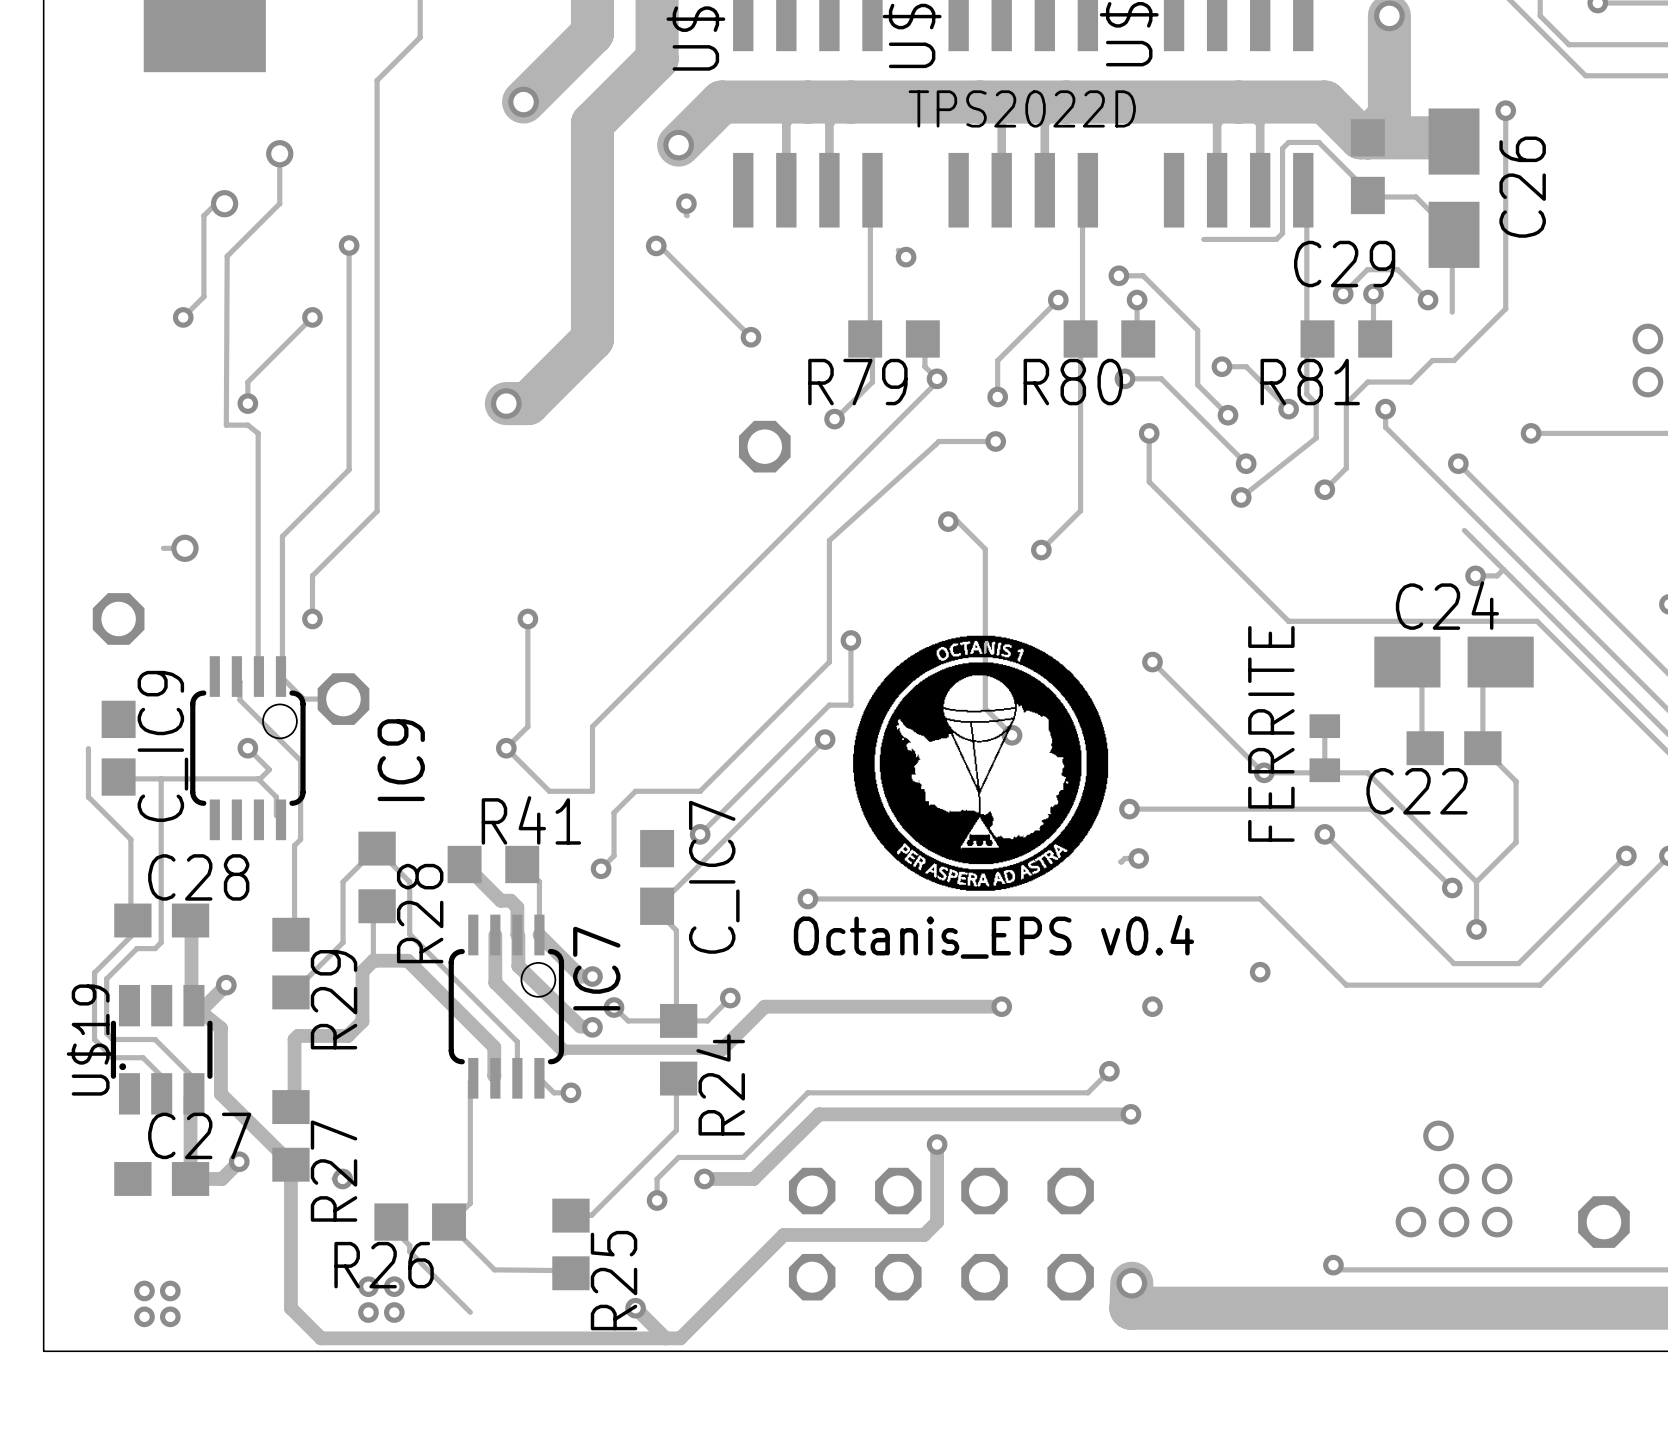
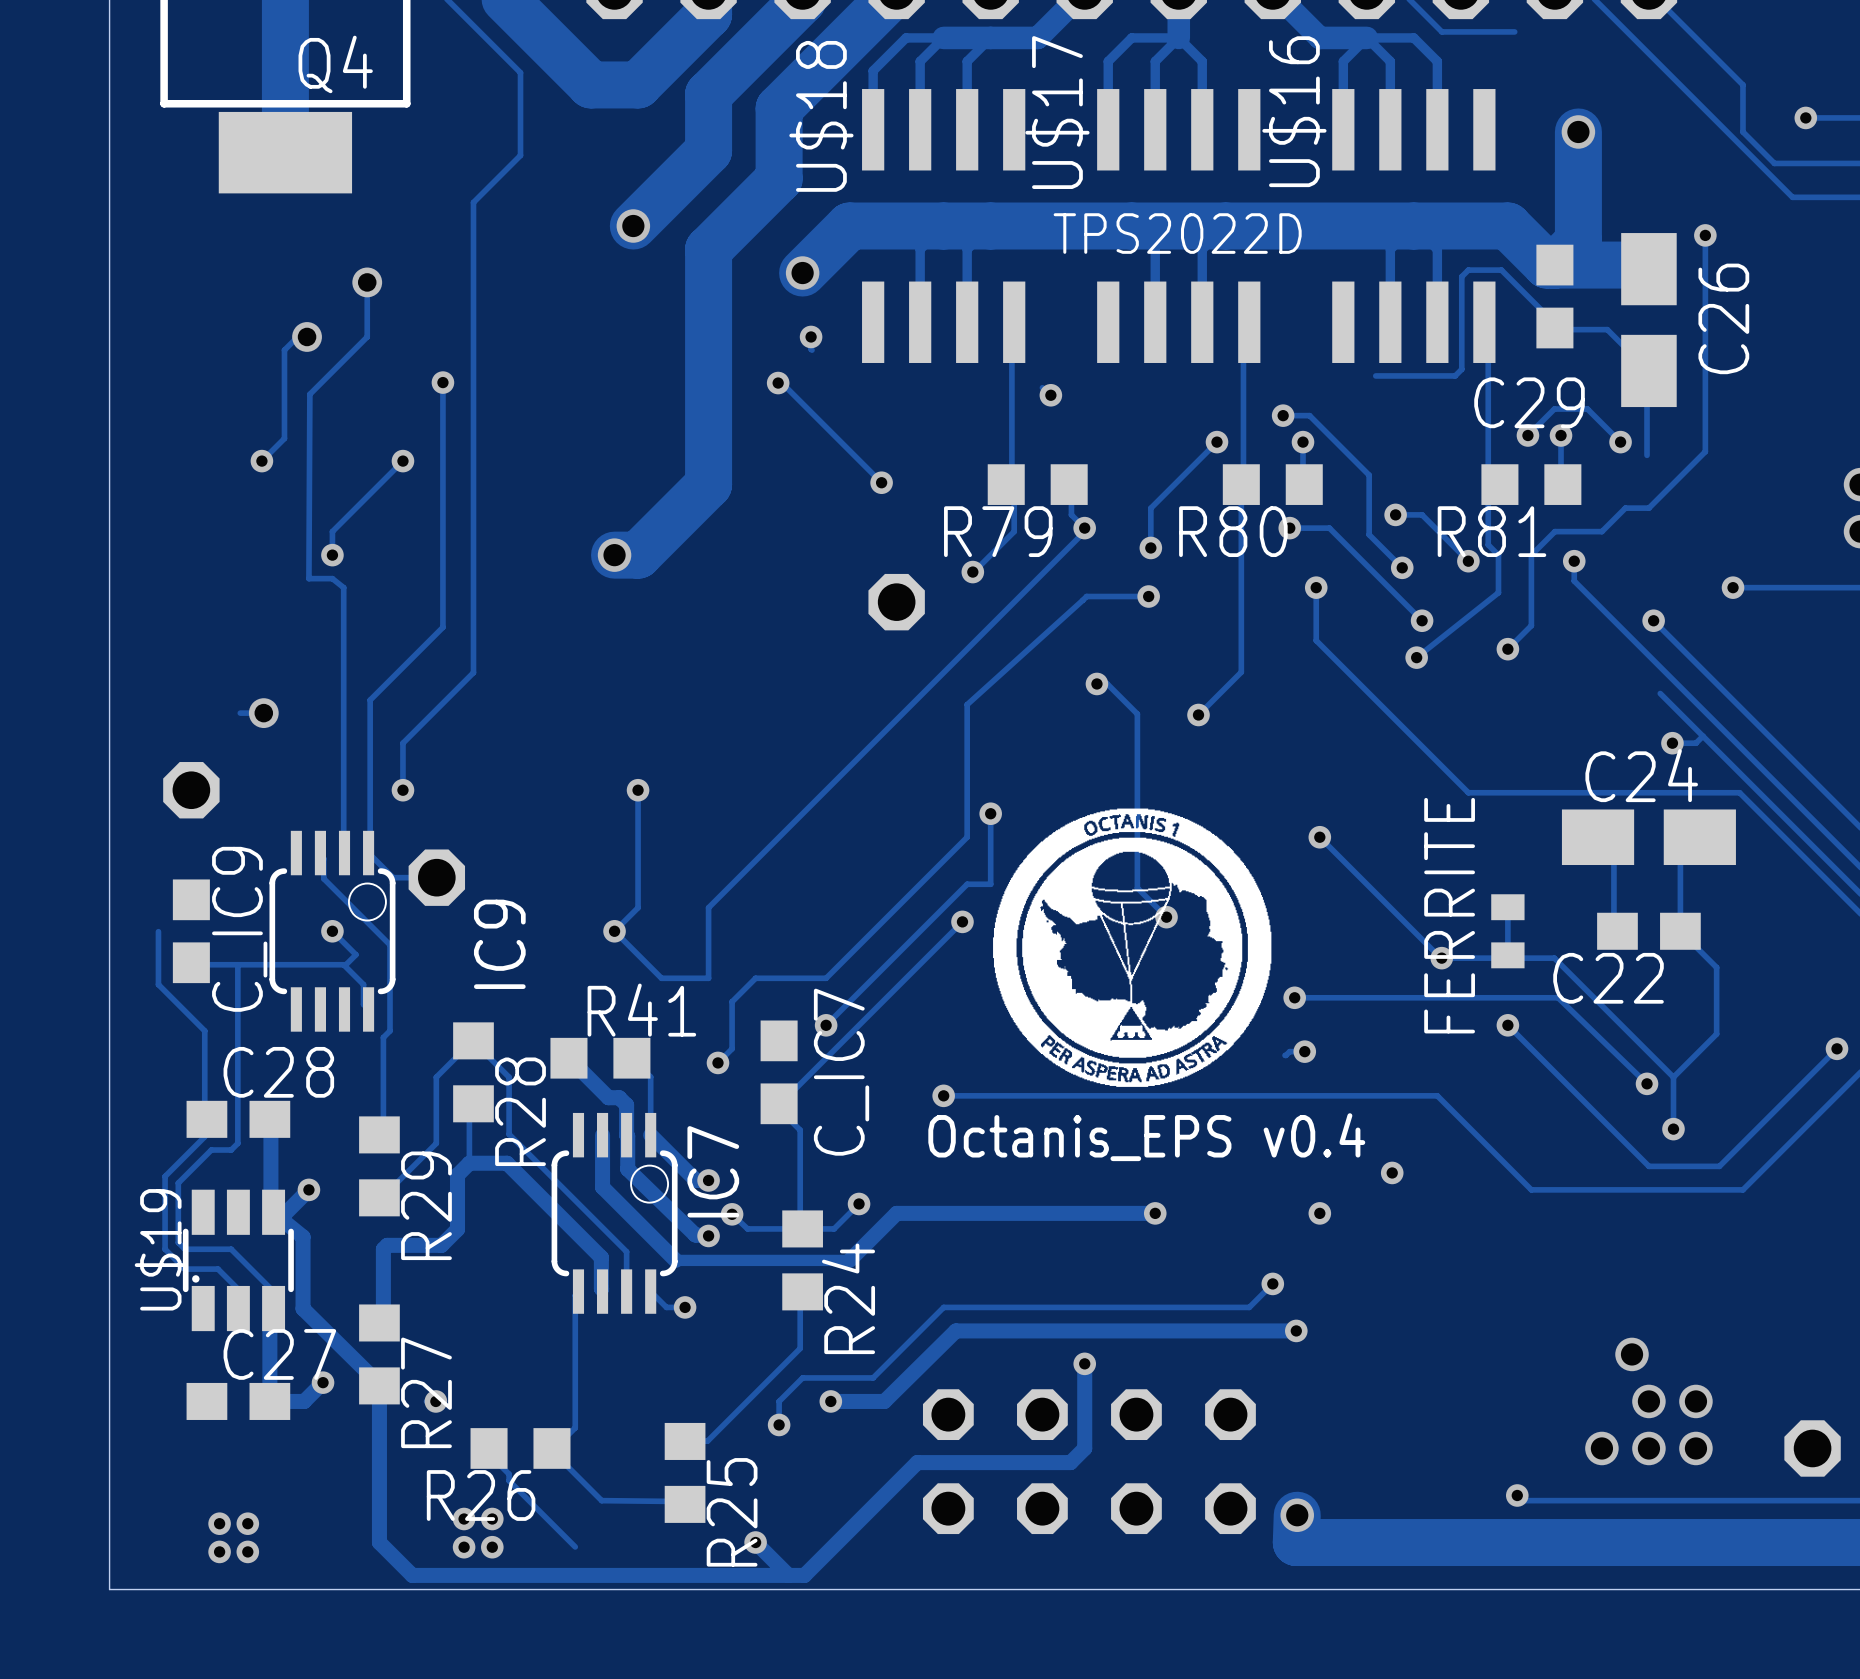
via position: (1260, 972) -> (1392, 1172)

